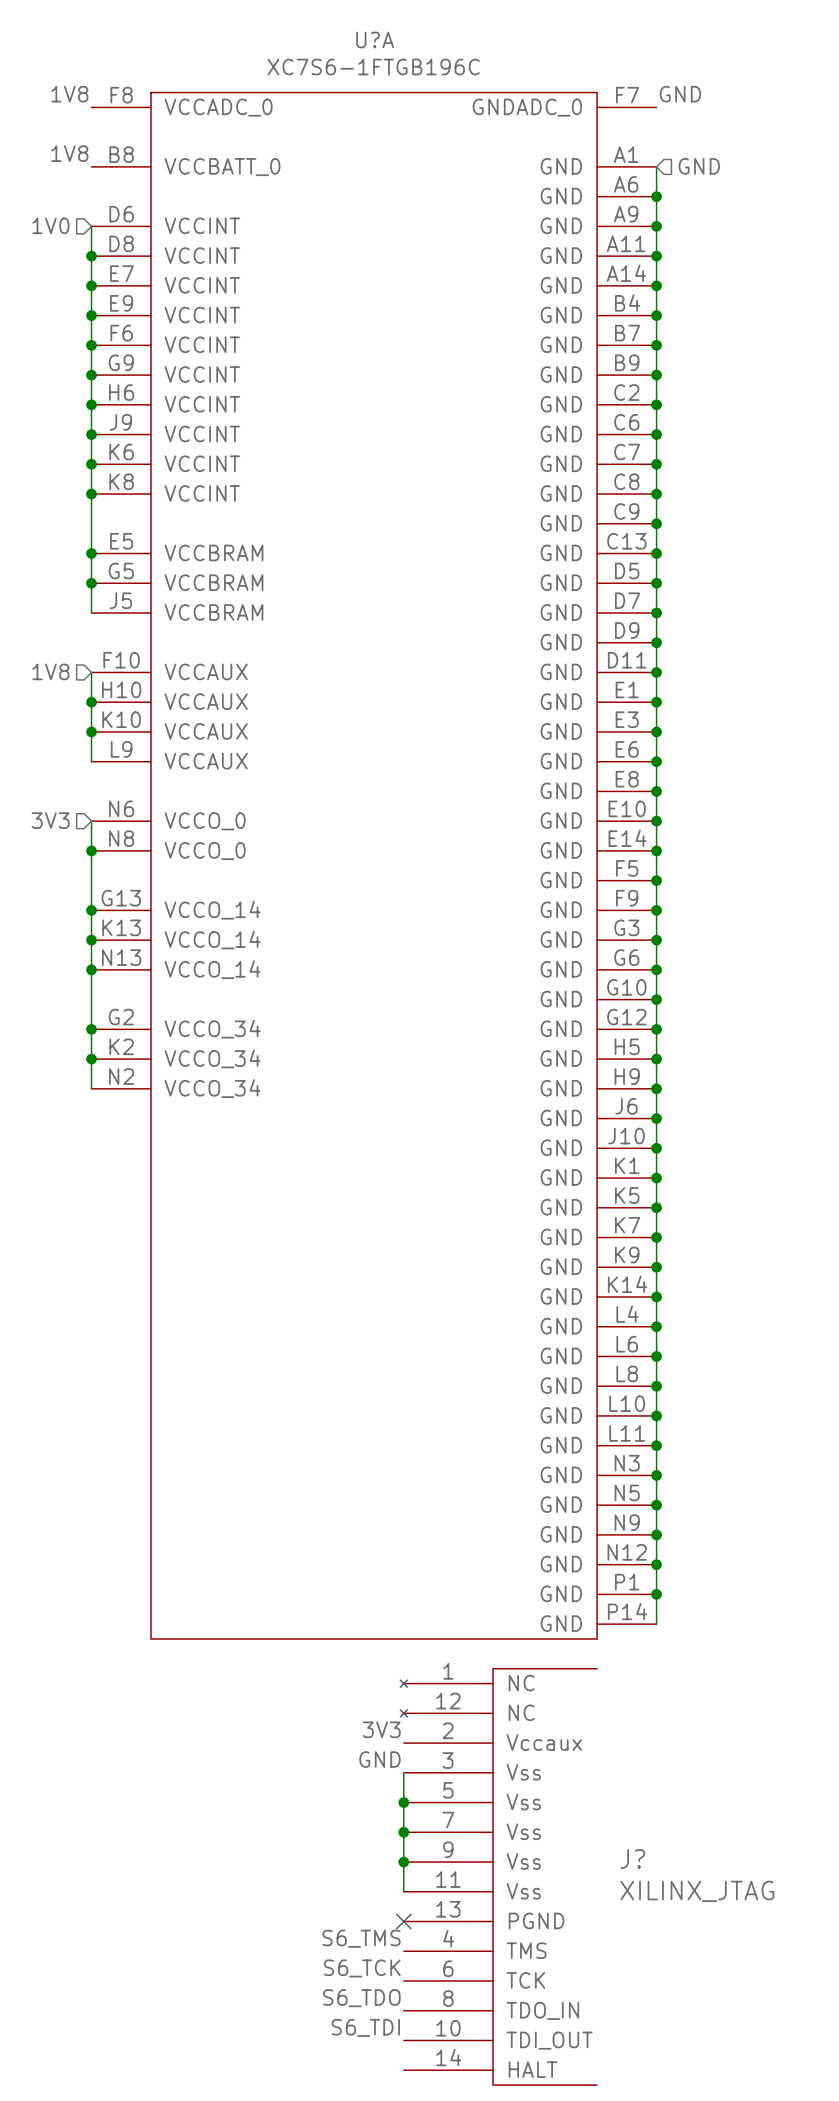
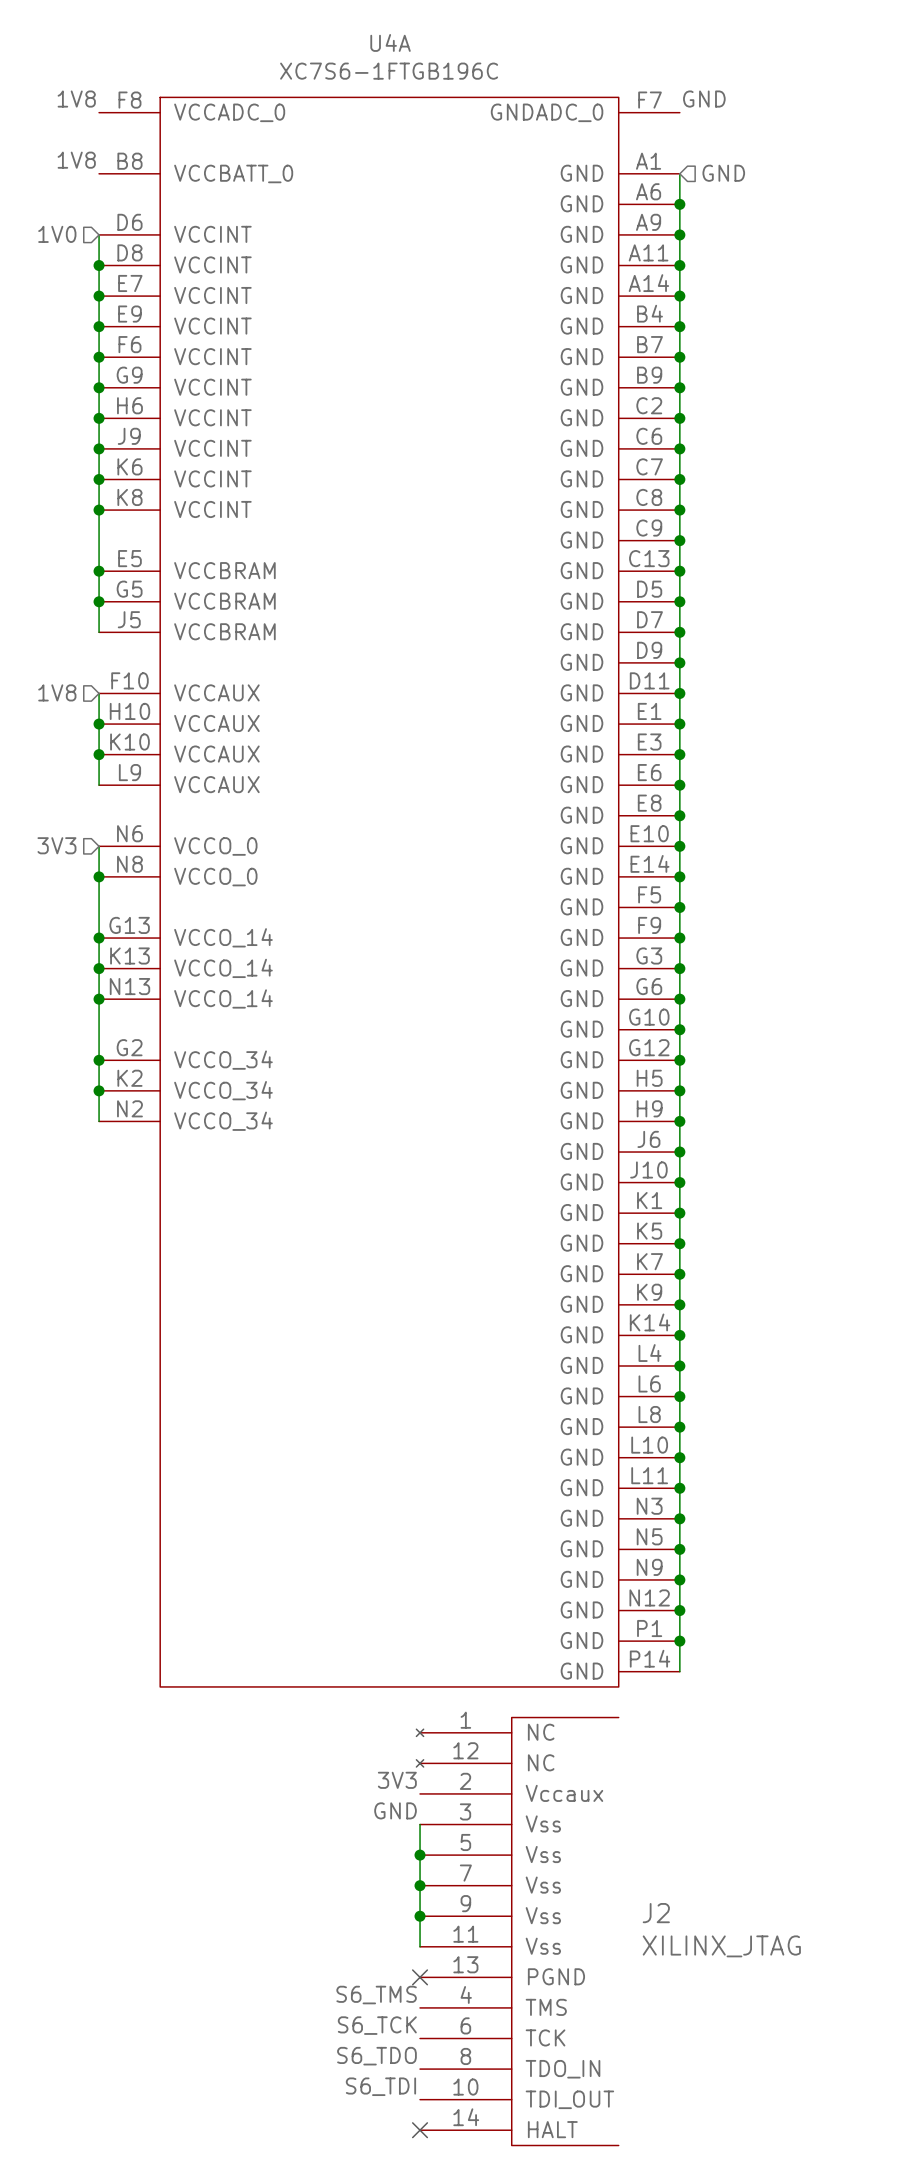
U?A name: U?A (375, 39) -> U4A (390, 42)
J? name: J? (632, 1859) -> J2 (656, 1913)
no-connect mark: none -> (420, 2130)

